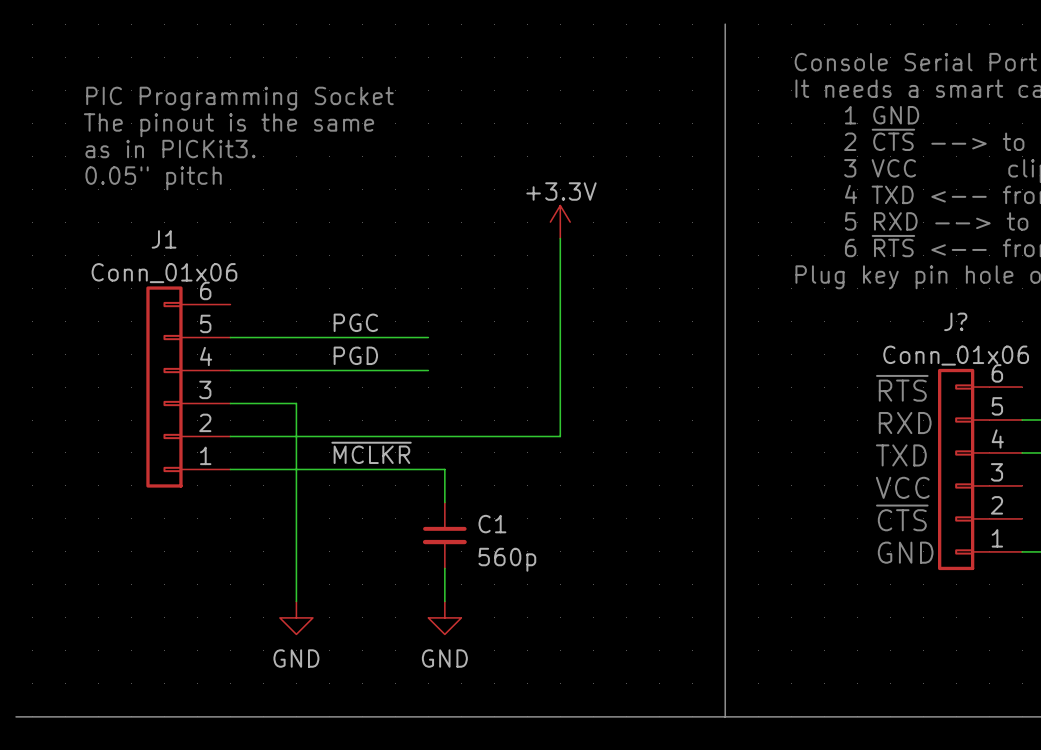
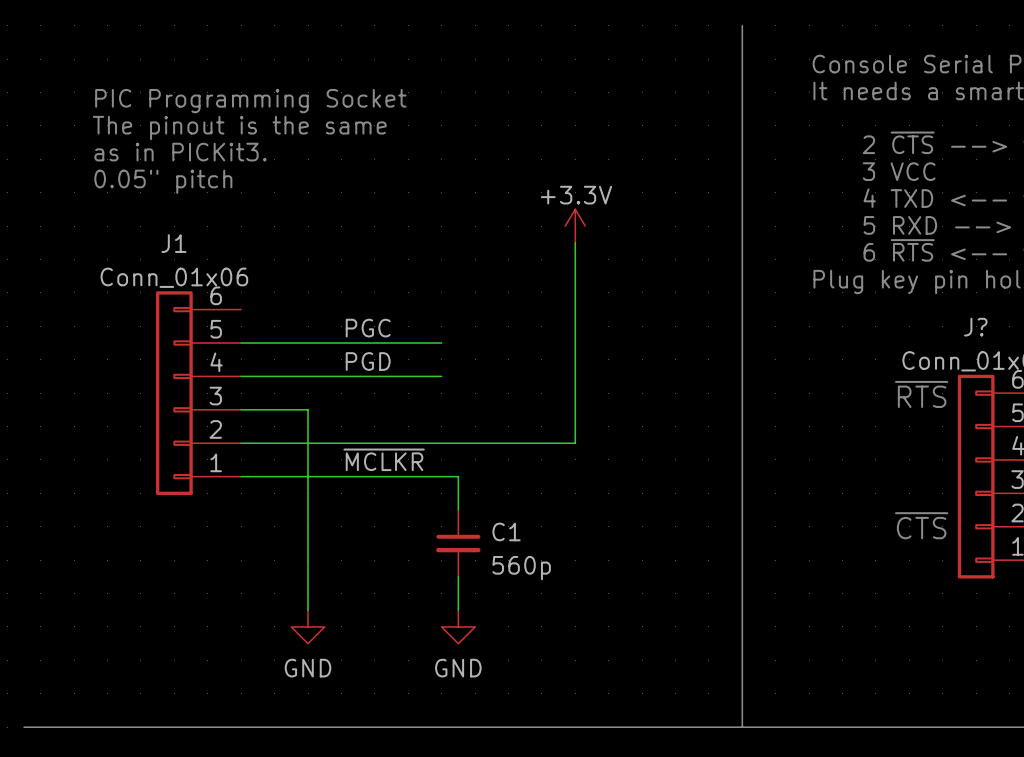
text: 1 GND (882, 115) -> none
text: RXD (905, 423) -> none
text: TXD (901, 455) -> none
text: VCC (902, 487) -> none
text: GND (905, 552) -> none

